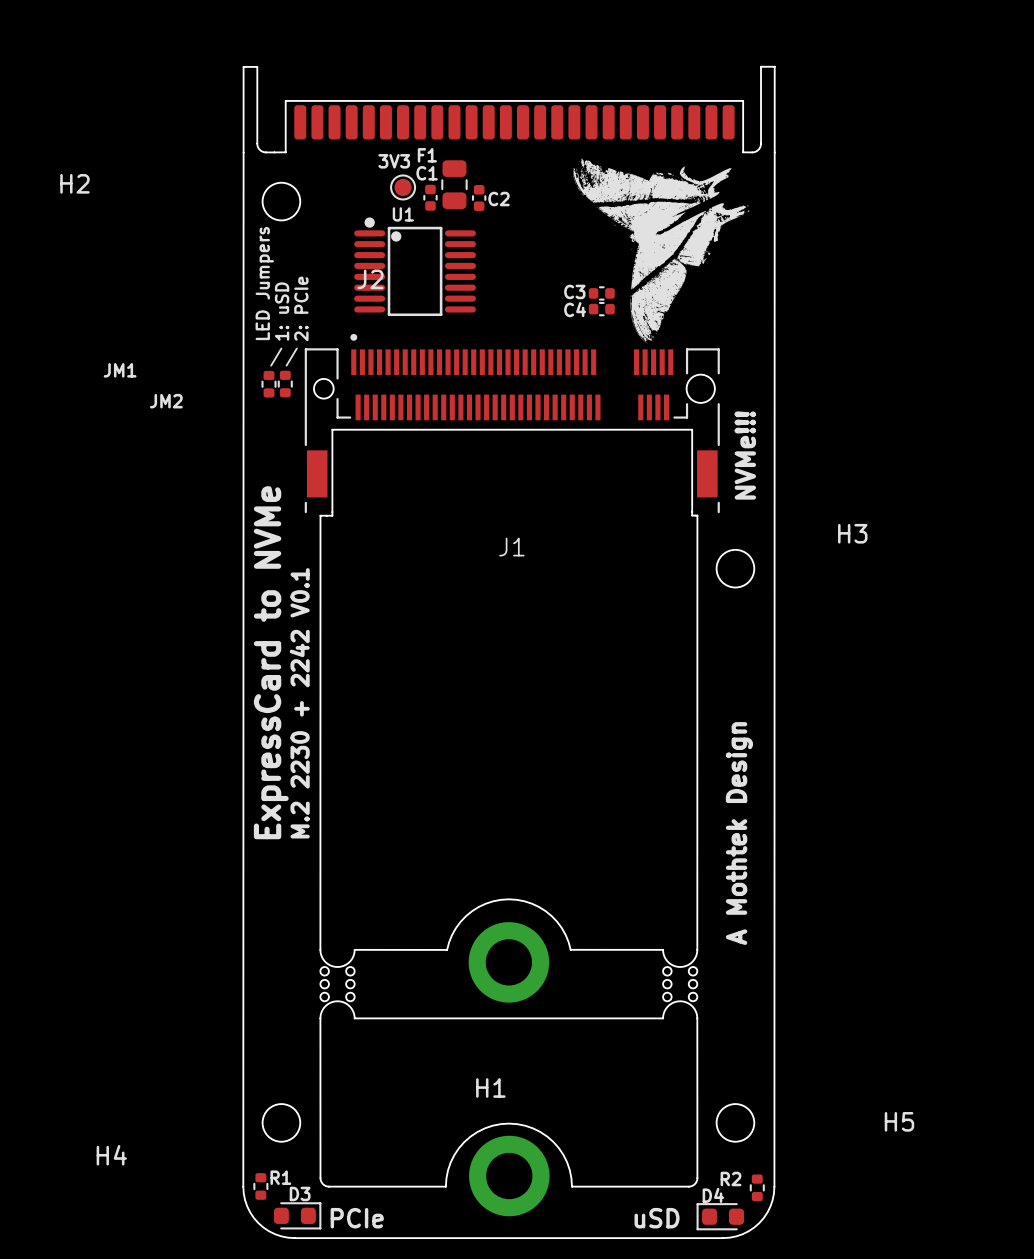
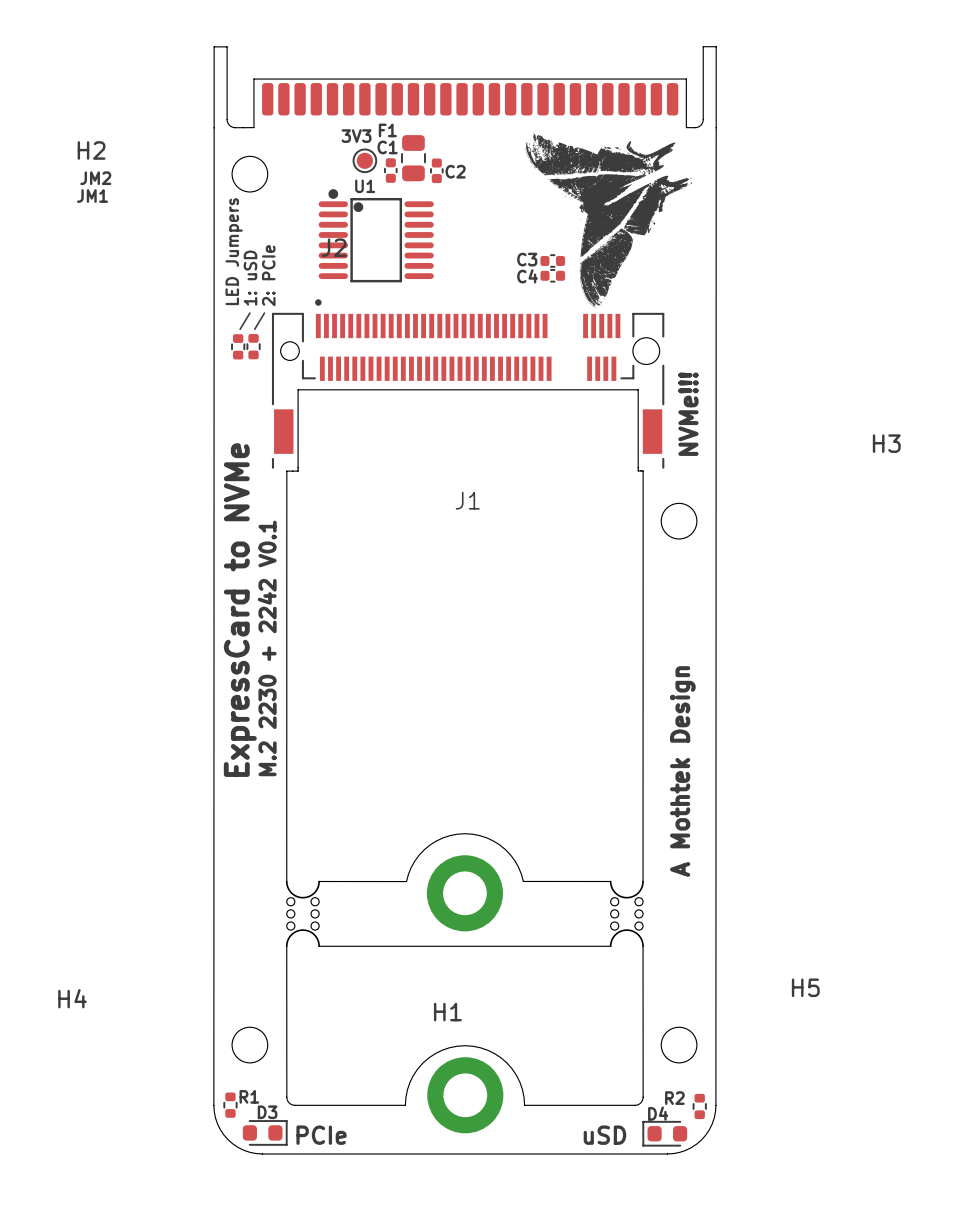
H2 name position: H2 (74, 183) -> H2 (91, 150)
JM1 name position: JM1 (120, 370) -> JM1 (92, 196)
JM2 name position: JM2 (166, 401) -> JM2 (95, 178)
H3 name position: H3 (852, 533) -> H3 (886, 443)
H5 name position: H5 (899, 1121) -> H5 (805, 987)
H4 name position: H4 (111, 1155) -> H4 (72, 998)

